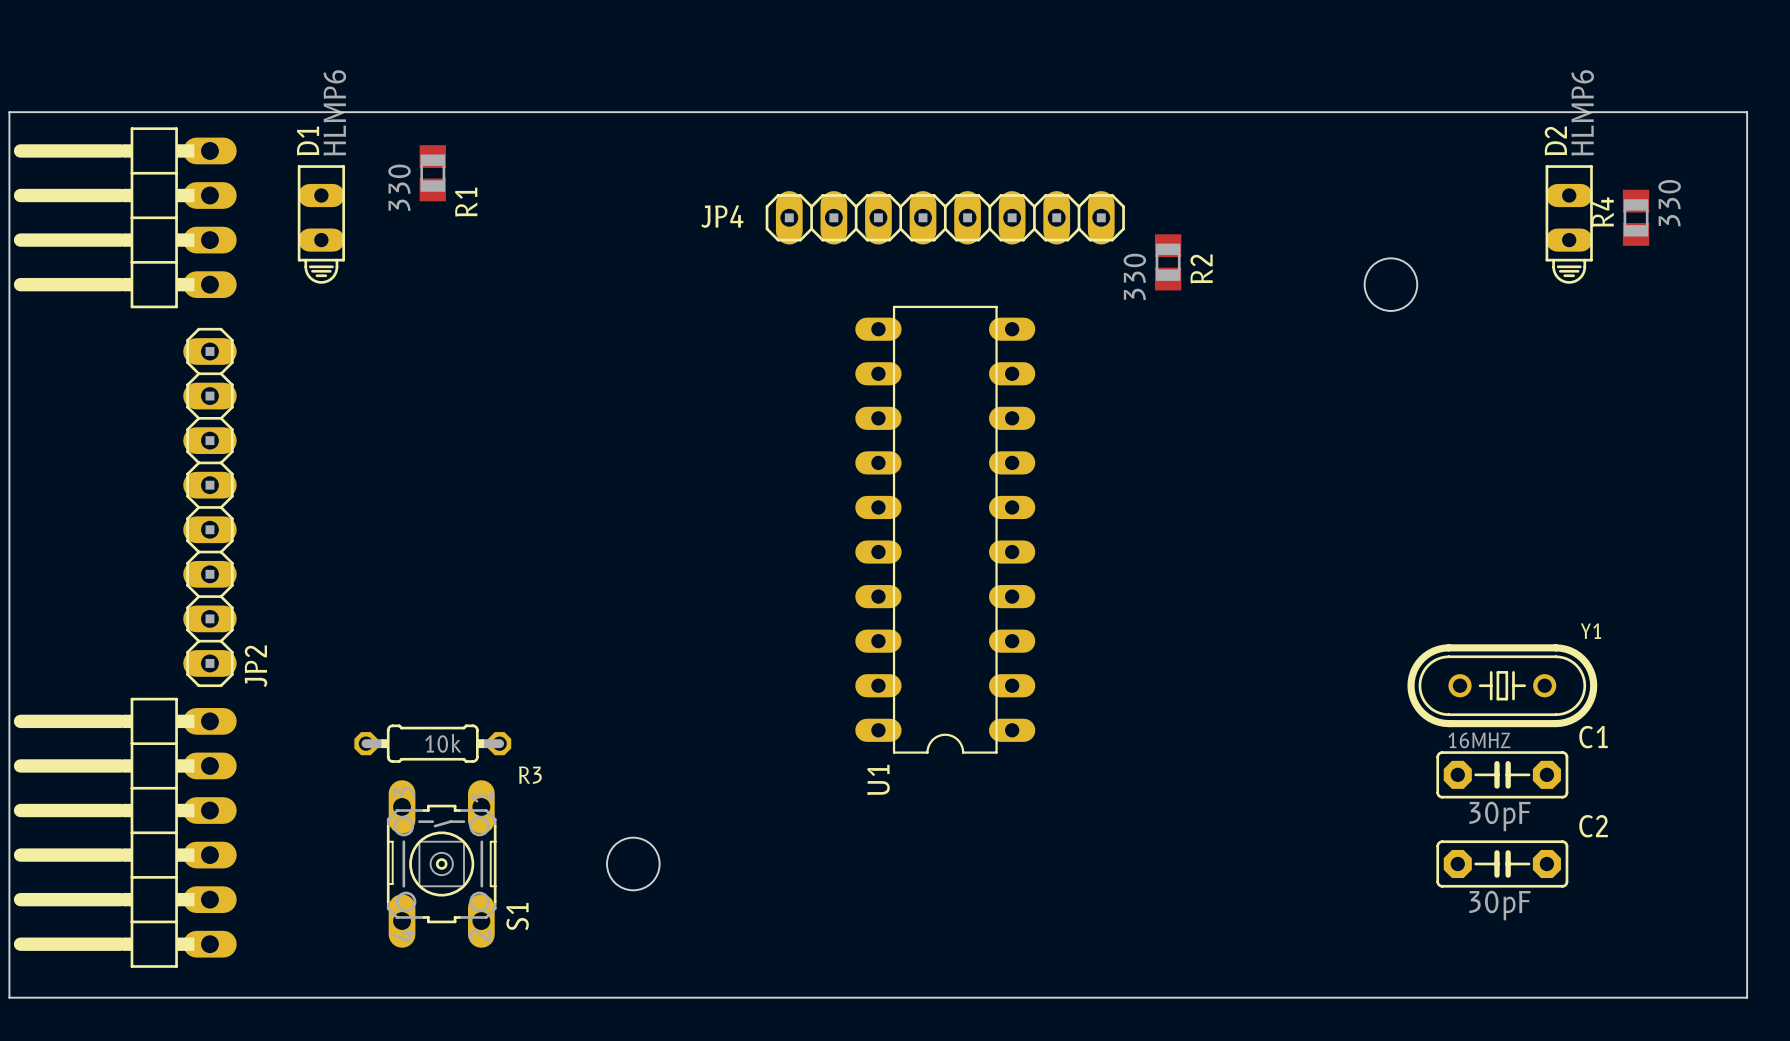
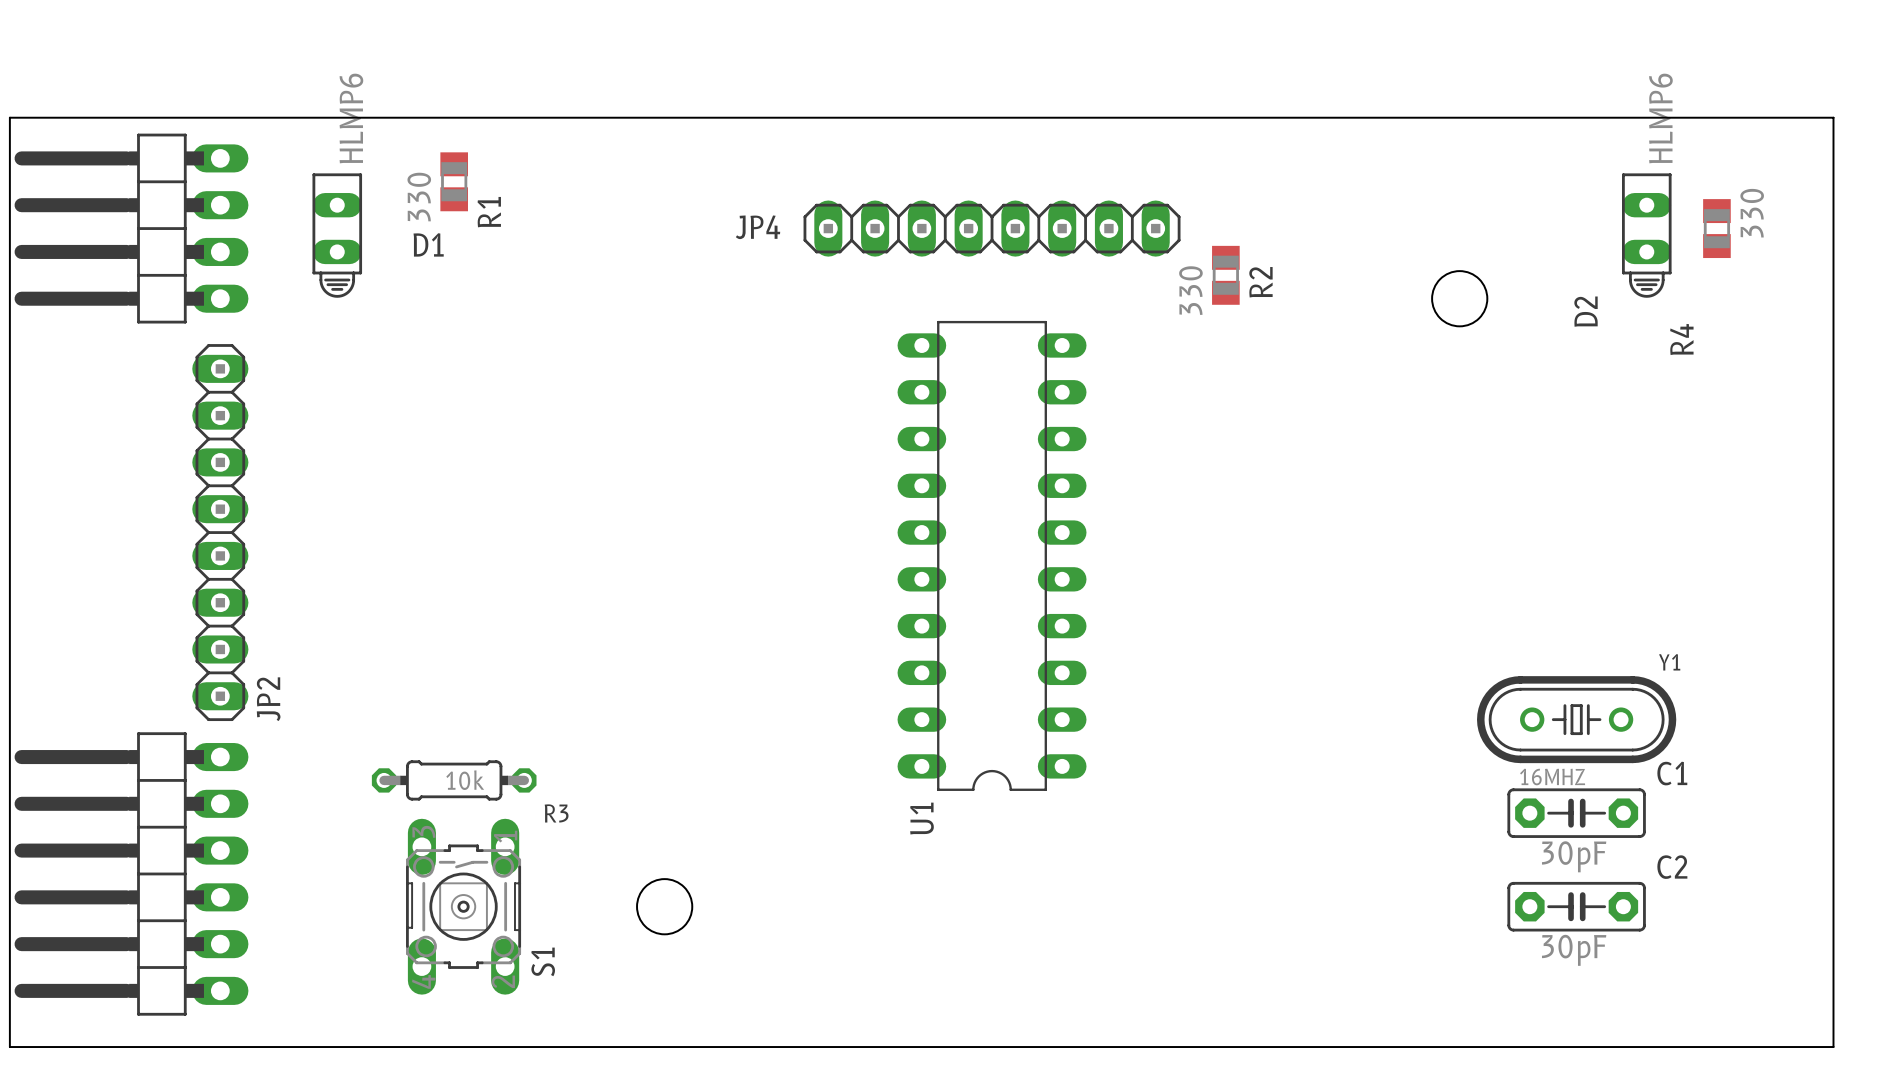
D2 name position: D2 (1555, 140) -> D2 (1586, 311)
D1 name rotation: 0° (308, 141) -> 90° clockwise (428, 244)
D1 name position: D1 (308, 141) -> D1 (428, 244)
R4 name position: R4 (1602, 212) -> R4 (1681, 339)

